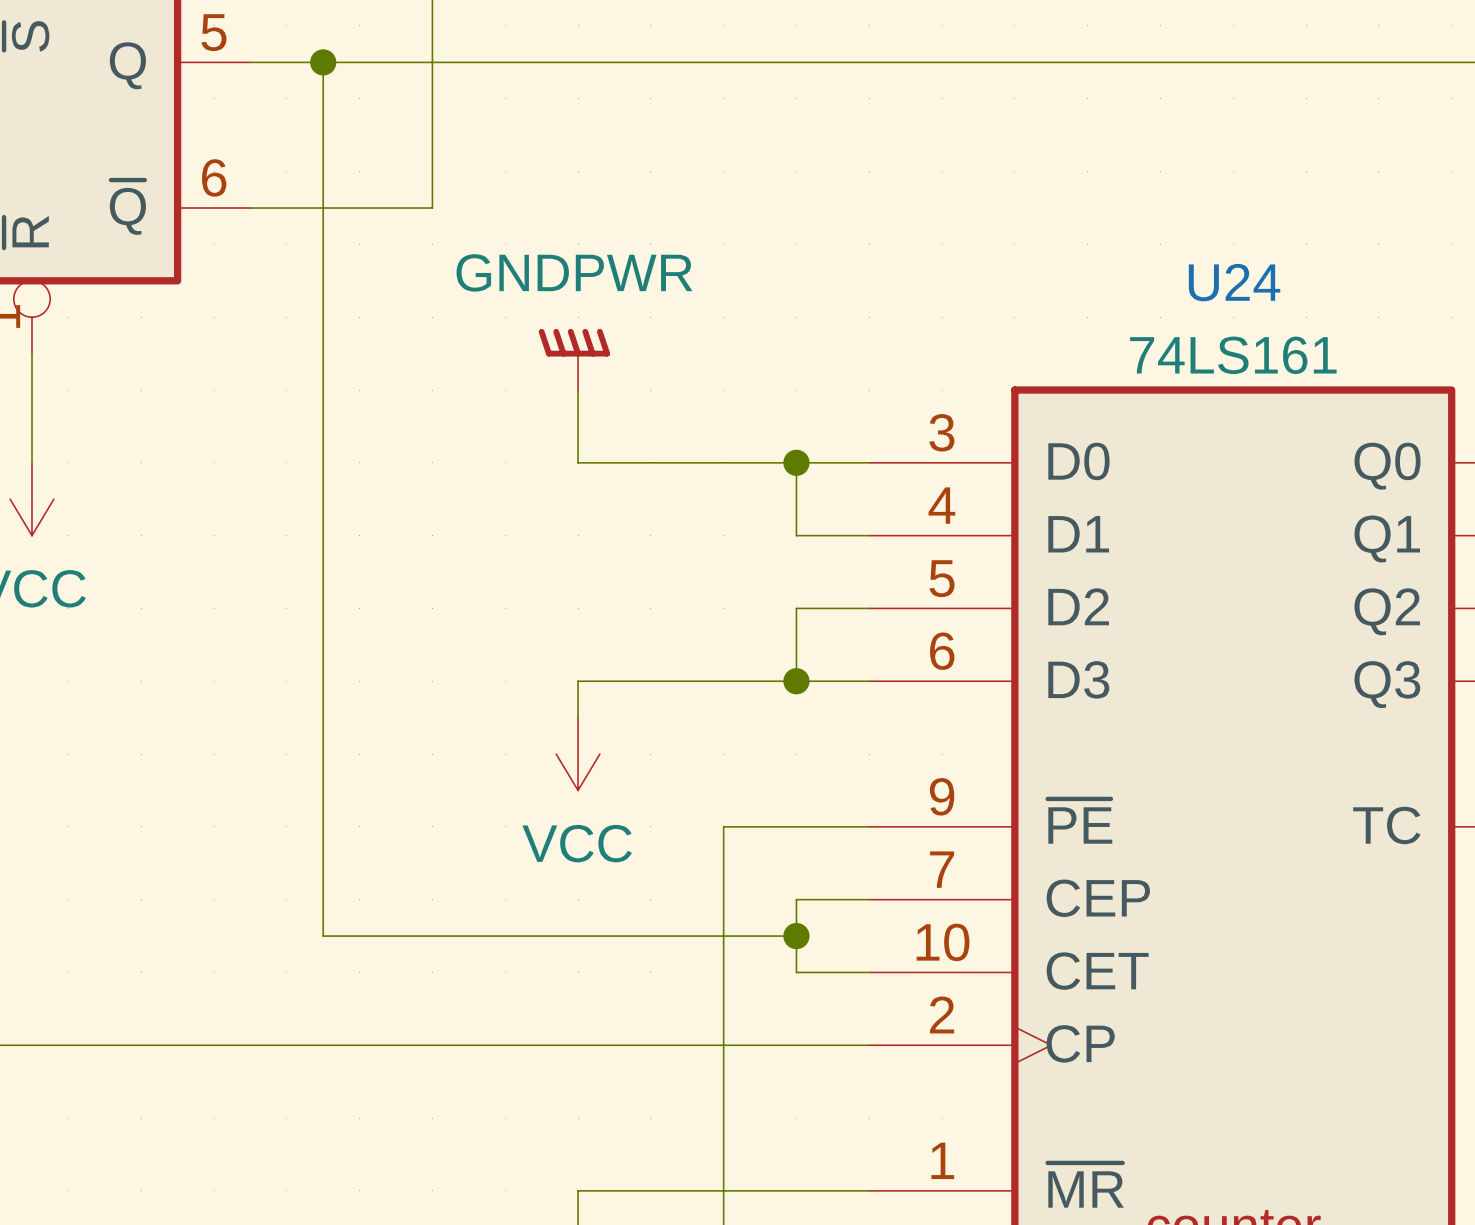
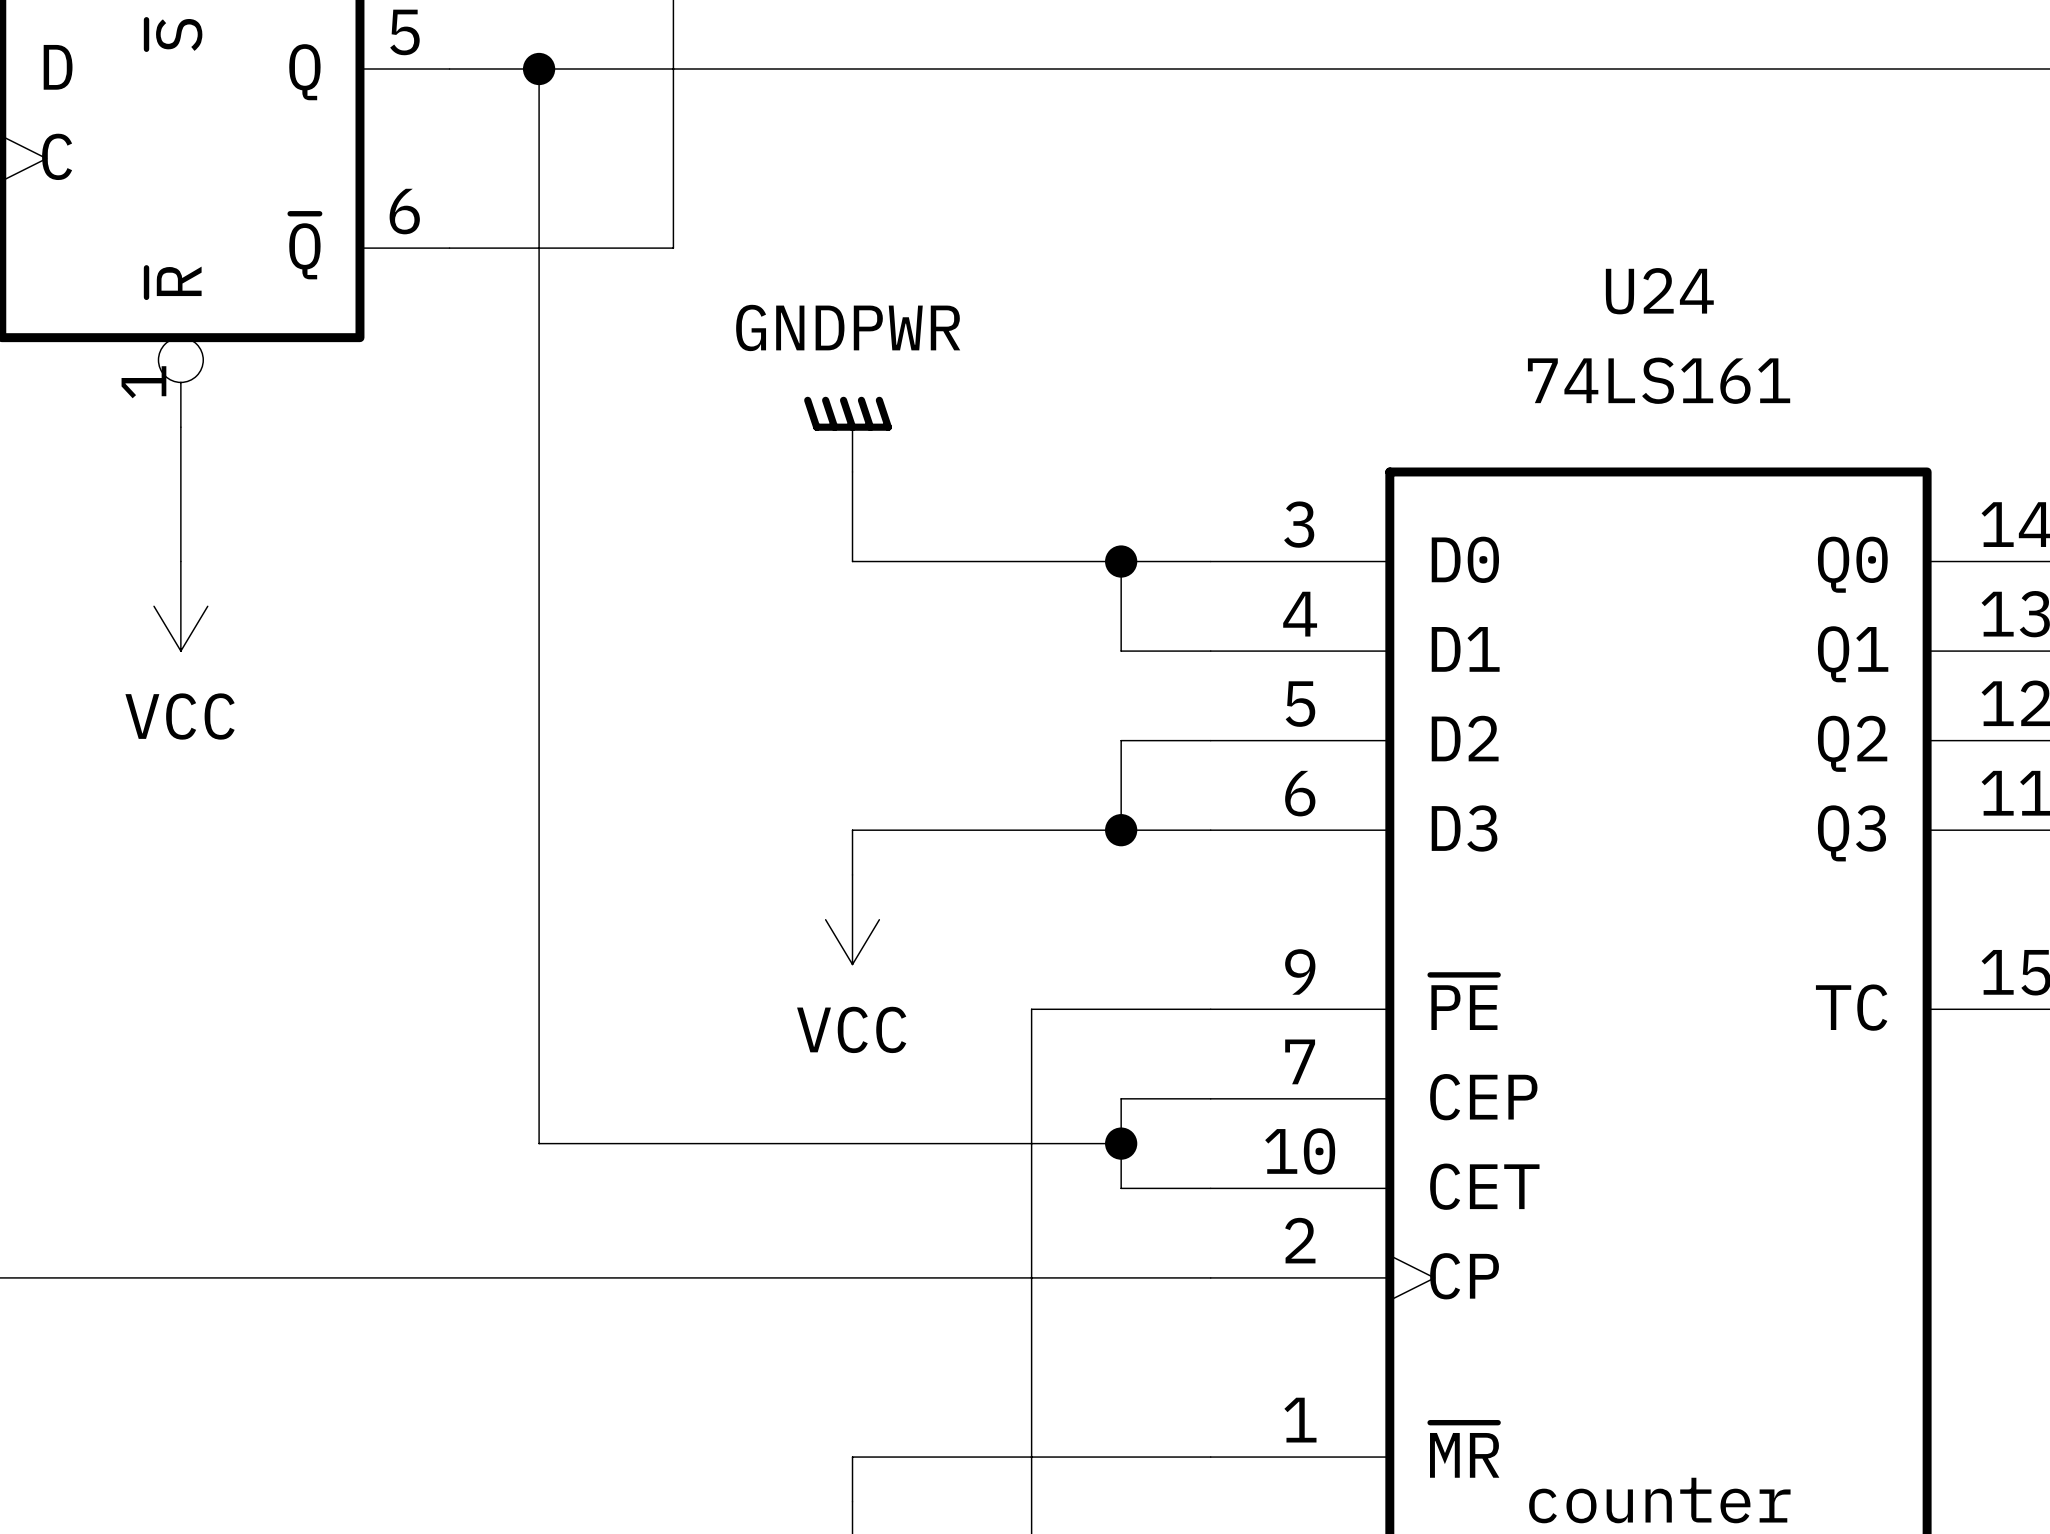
U24 name position: U24 (1234, 282) -> U24 (1659, 291)
U24 value position: 74LS161 (1233, 355) -> 74LS161 (1659, 380)

